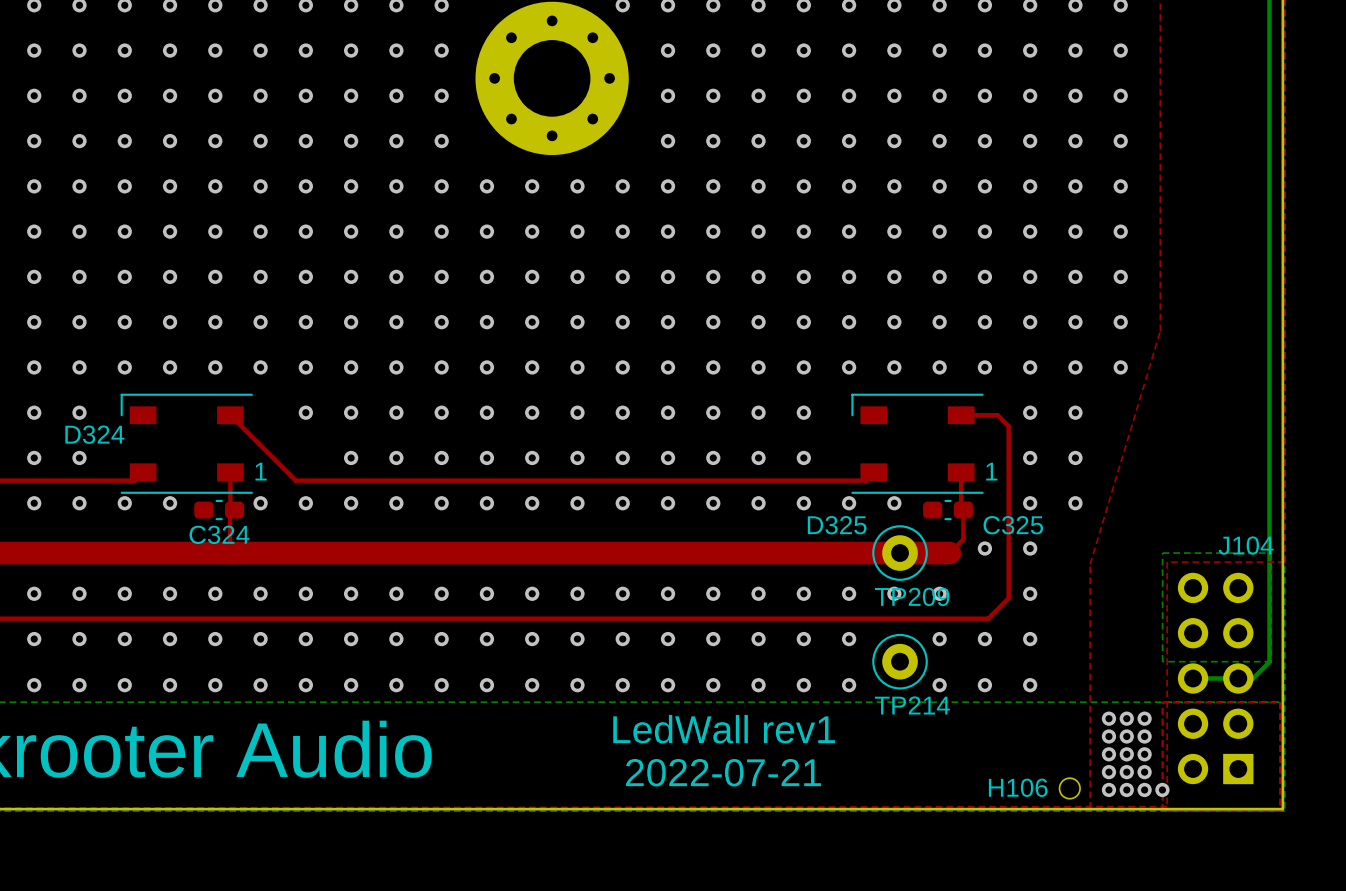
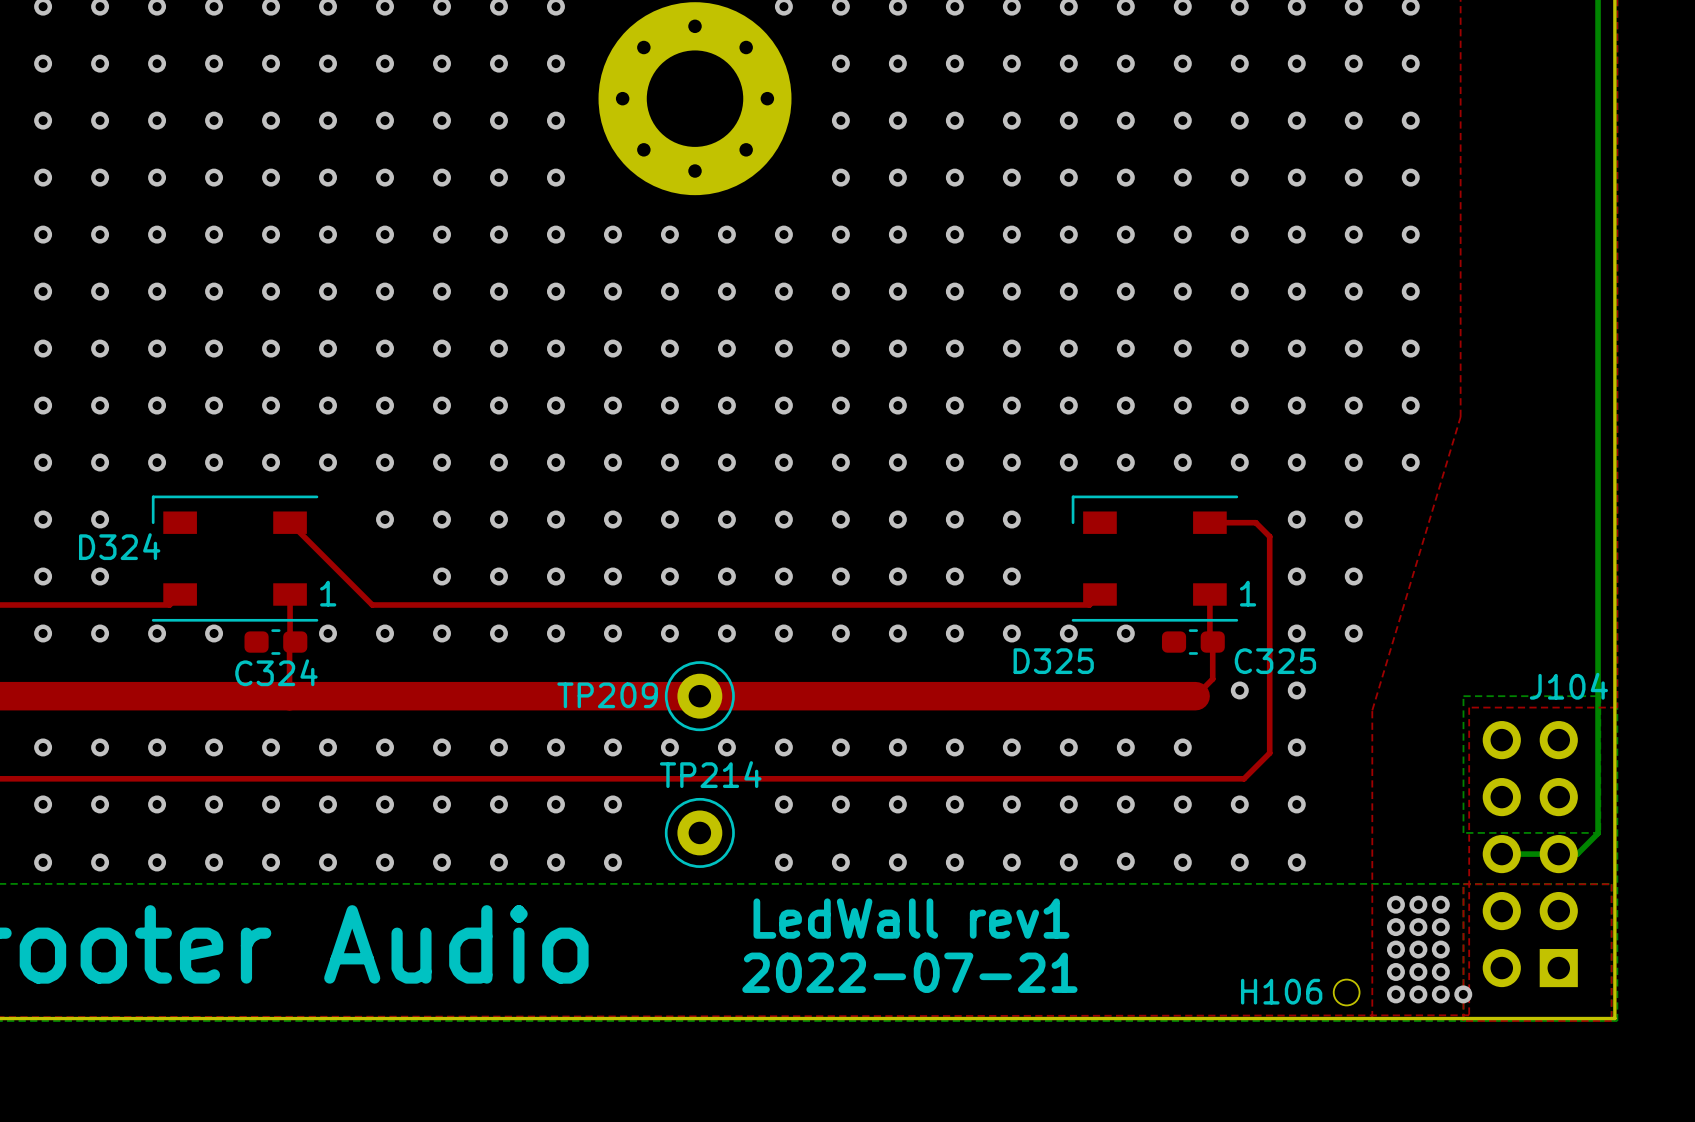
TP209 position: (900, 553) -> (699, 696)
TP209 name position: TP209 (912, 596) -> TP209 (607, 695)
via: (532, 639) -> none
via: (577, 639) -> none
via: none -> (1125, 804)
TP214 position: (900, 661) -> (699, 832)
via: none -> (1125, 861)
via: (532, 685) -> none
via: (577, 685) -> none
TP214 name position: TP214 (912, 705) -> TP214 (710, 774)

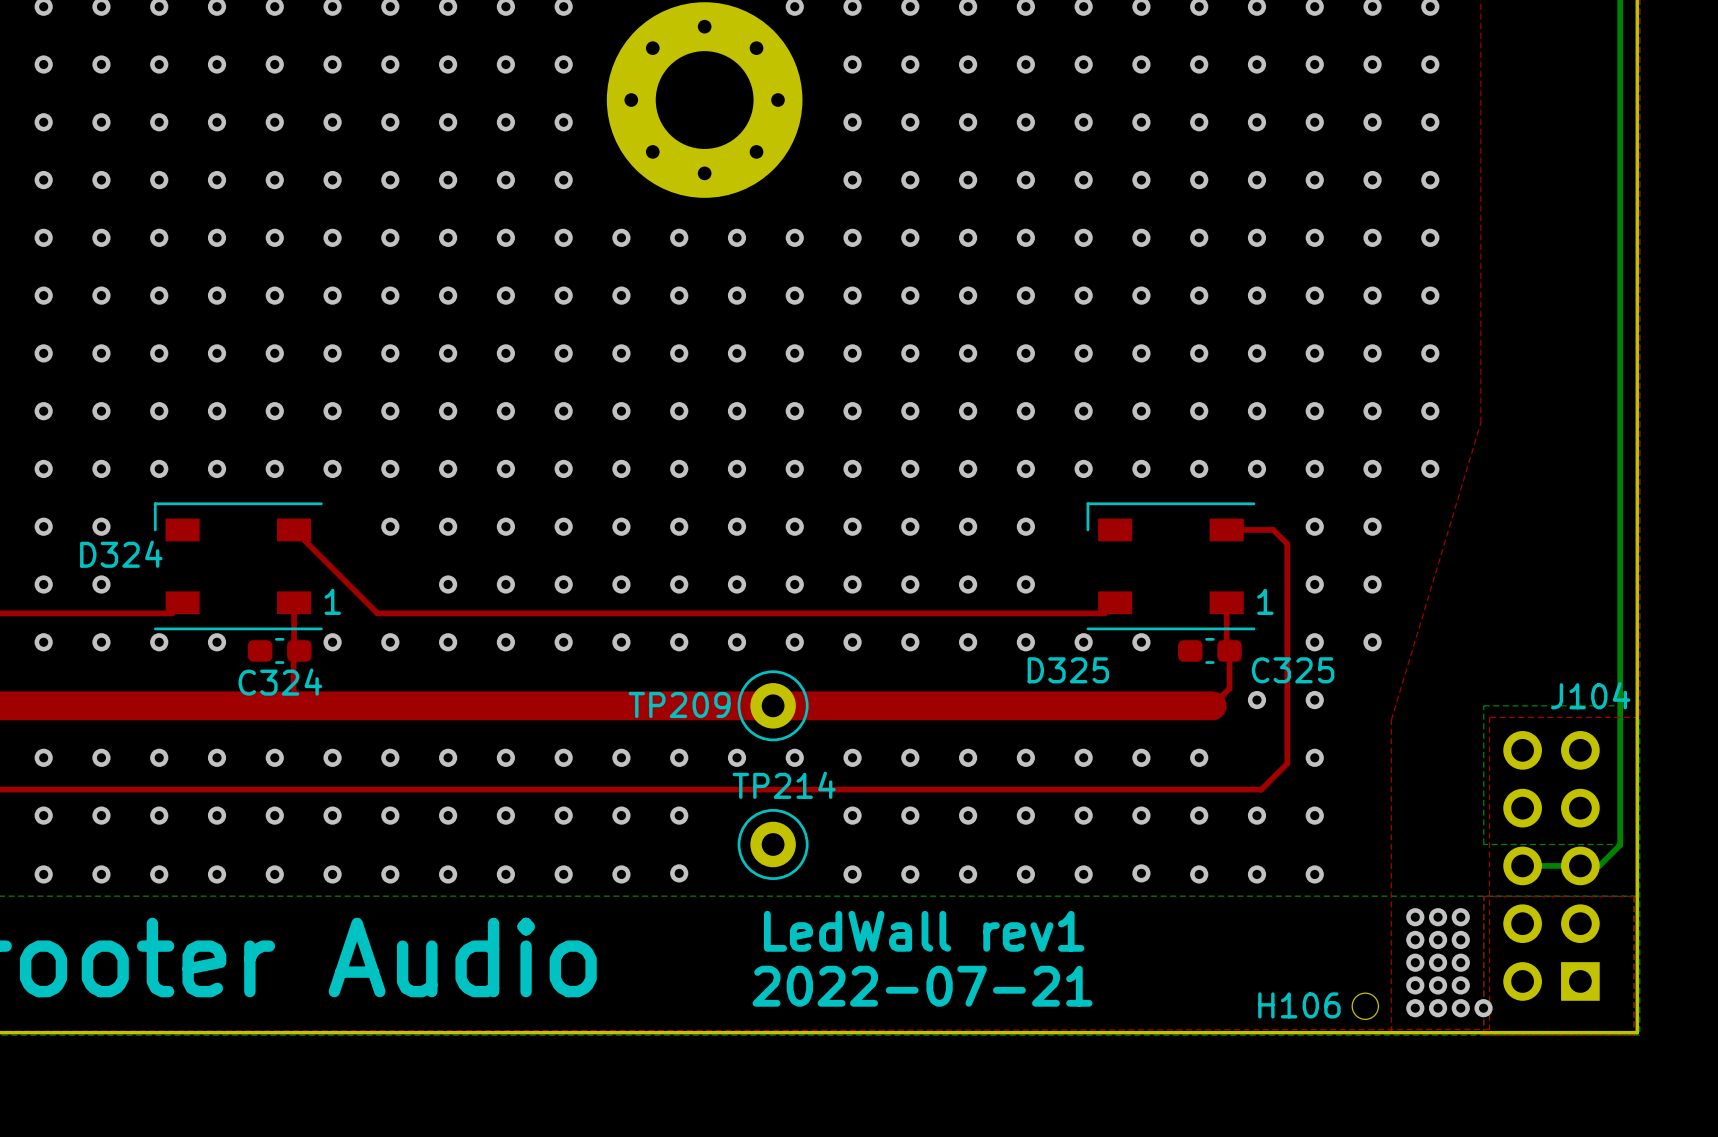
TP209 position: (699, 696) -> (773, 705)
via: none -> (679, 815)
via: (783, 804) -> none
TP214 position: (699, 832) -> (773, 844)
via: none -> (679, 873)
via: (783, 862) -> none

